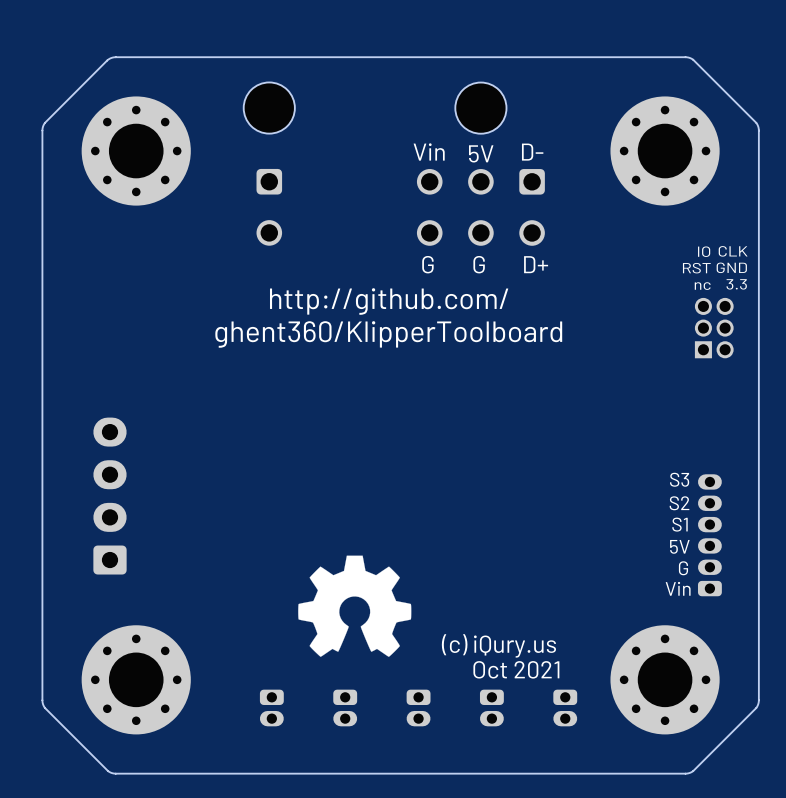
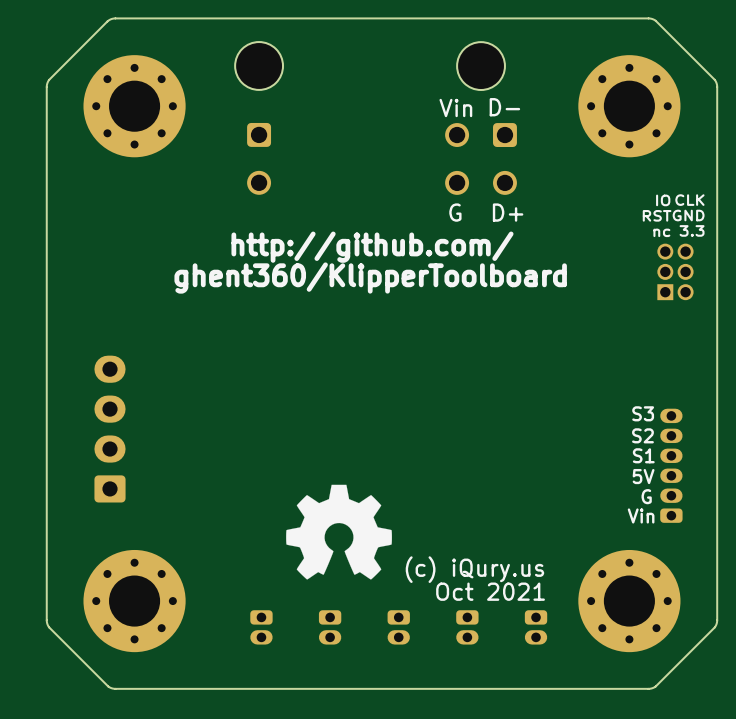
text: Vin (429, 151) -> none
text: 5V (481, 153) -> Vin (455, 108)
part: (480, 164) -> none
part: none -> (481, 118)
text: G (427, 264) -> none

